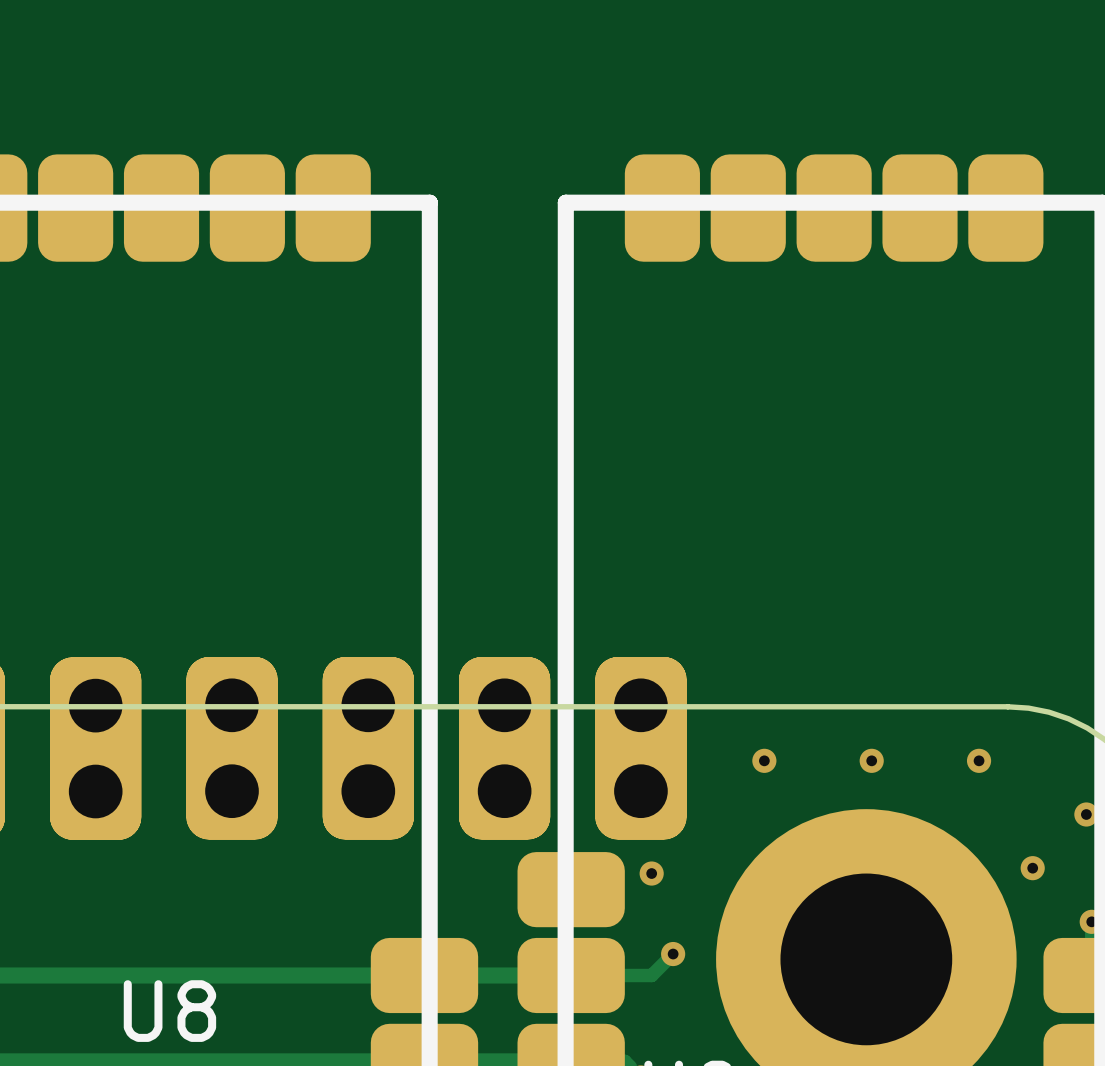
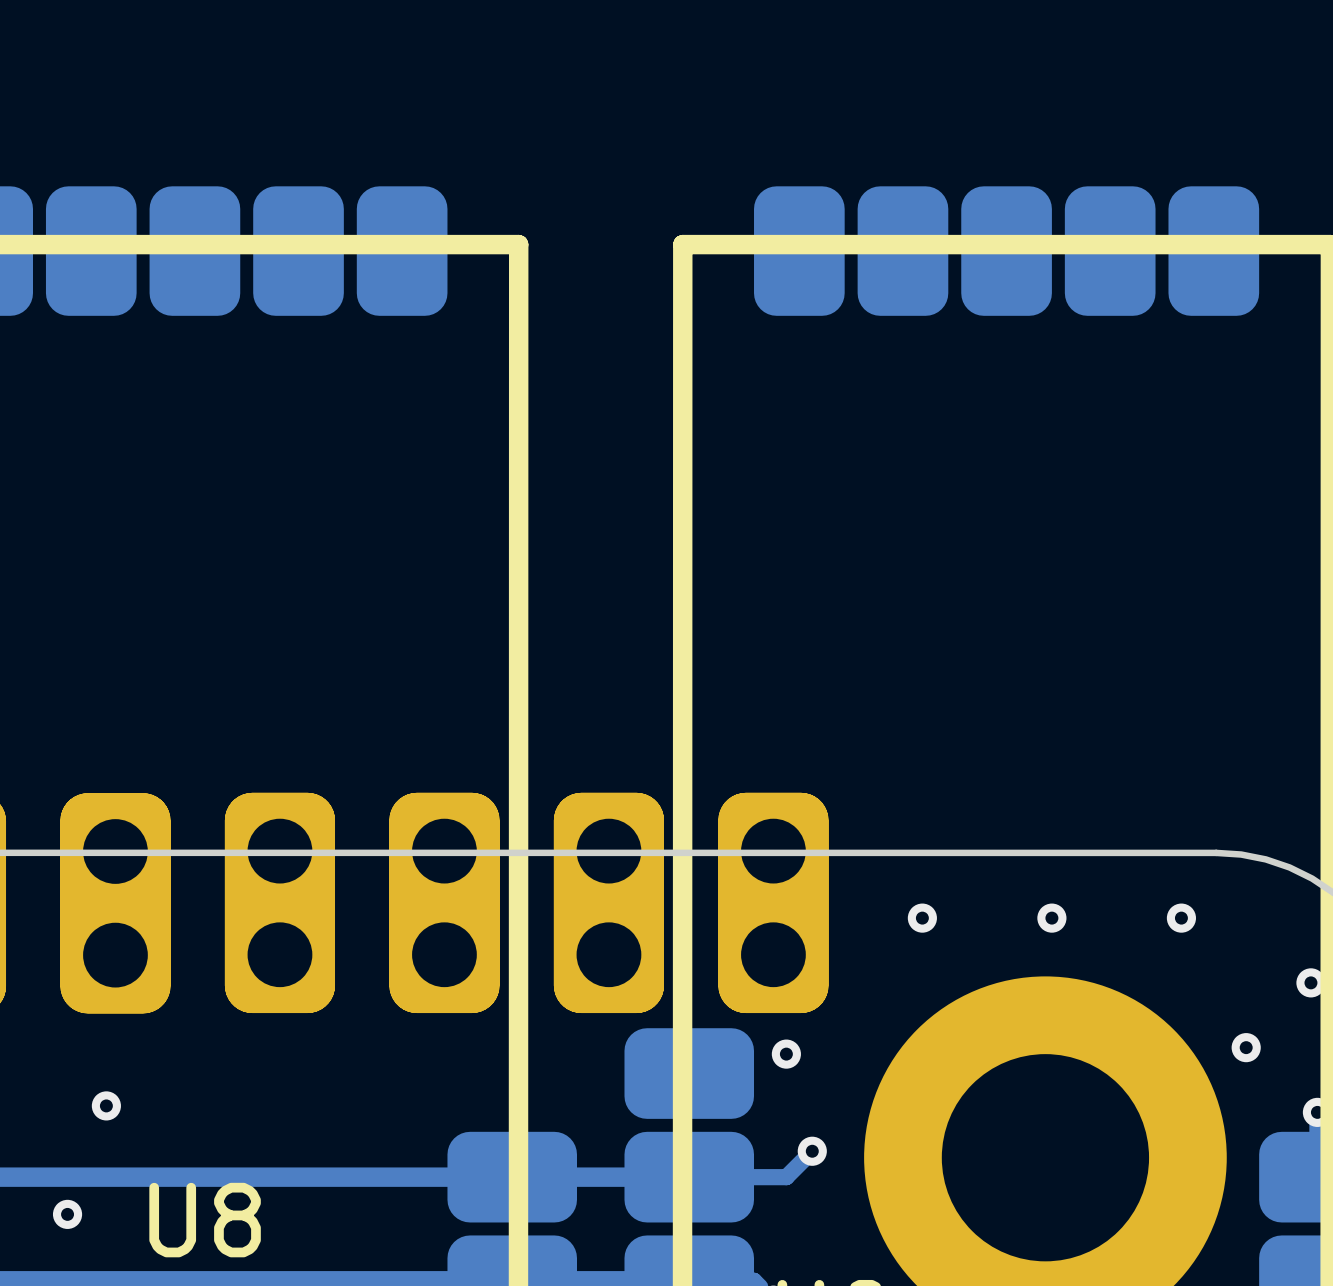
via: none -> (106, 1105)
via: none -> (67, 1214)

